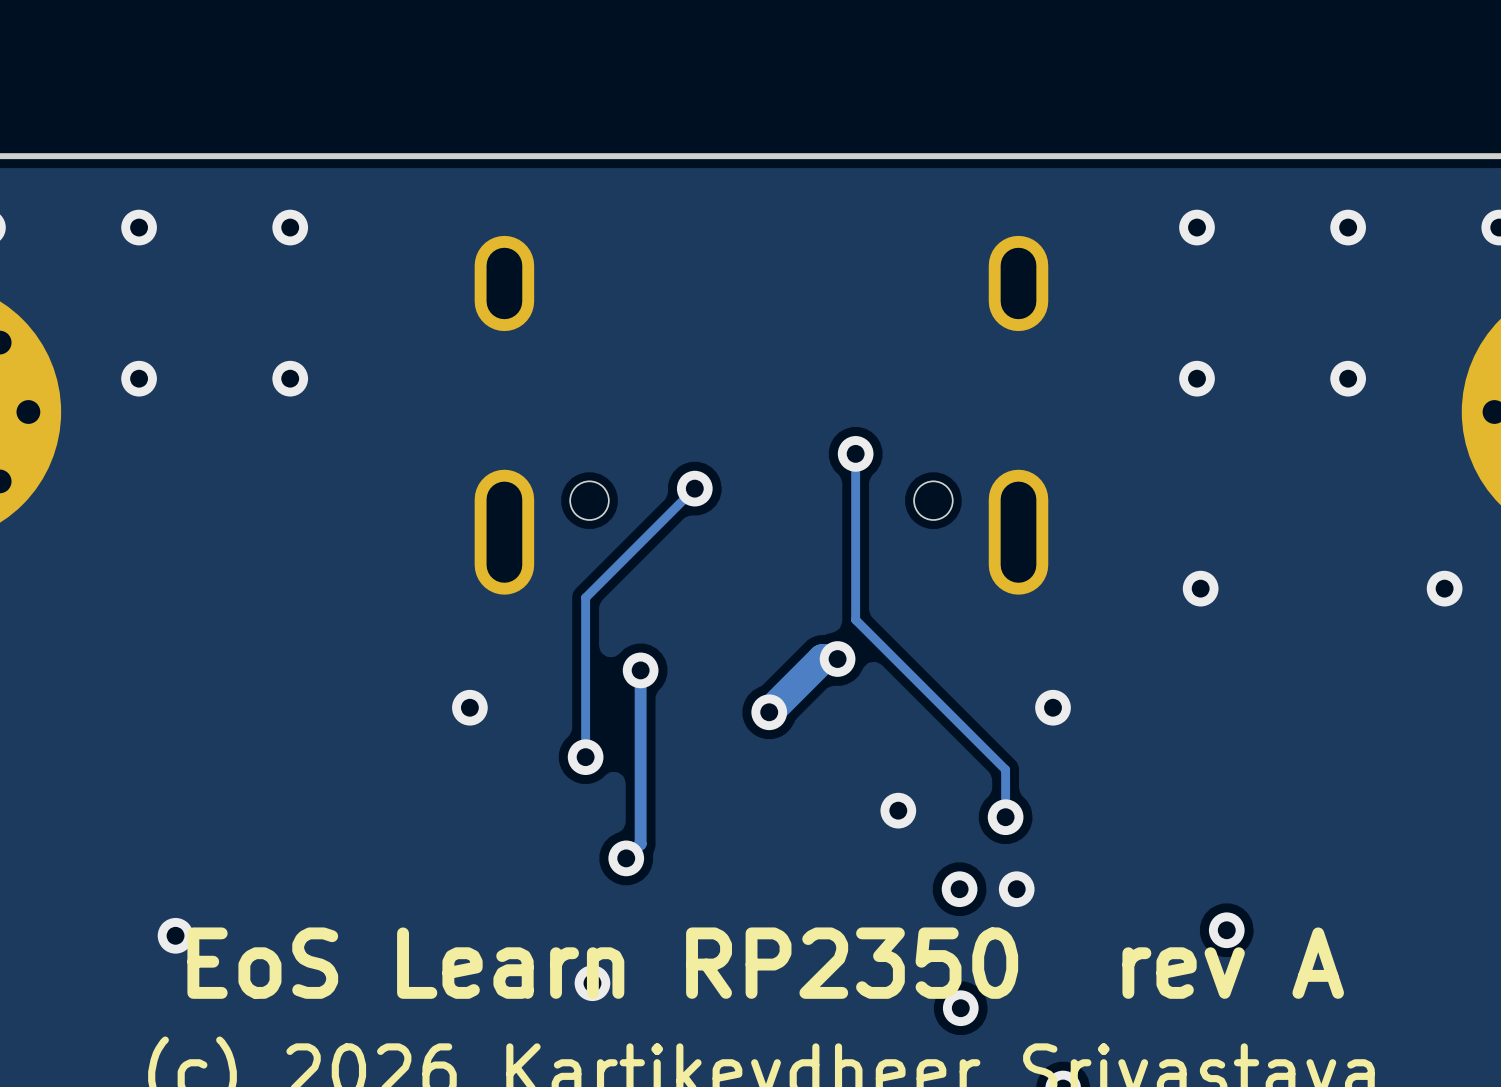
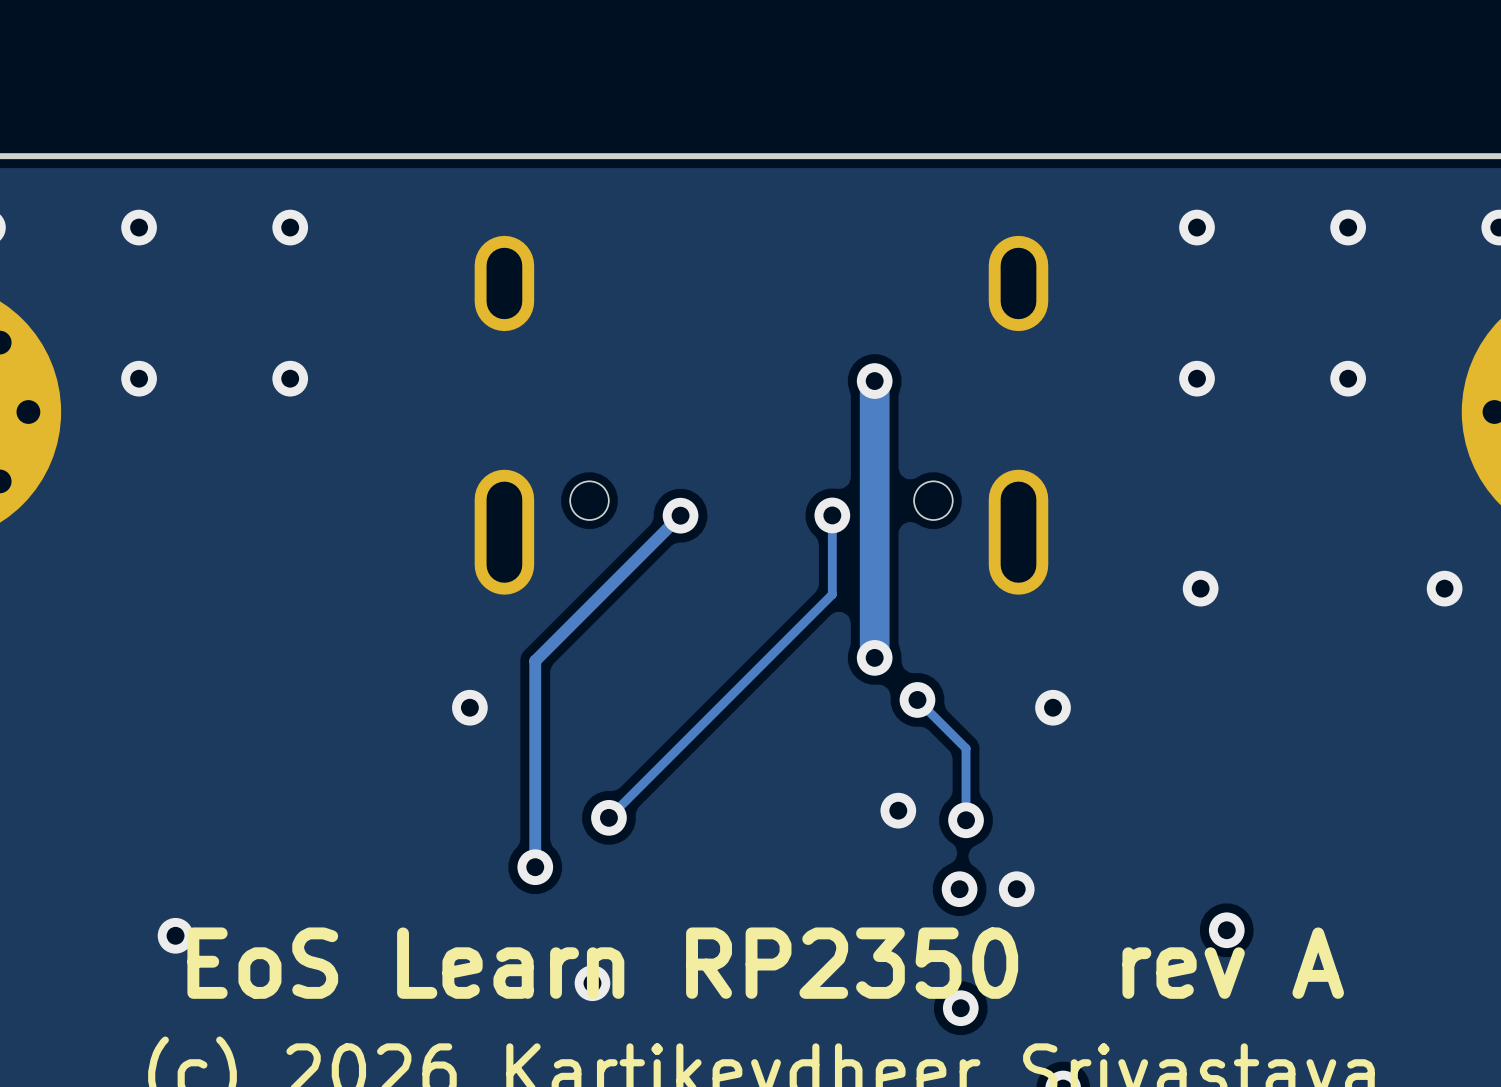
track: none -> (874, 381) (874, 657)
via: none -> (874, 381)
track: (855, 453) (855, 619) (1005, 769) (1005, 817) -> none
via: (855, 453) -> none
track: (694, 488) (585, 597) (585, 757) -> none
via position: (694, 488) -> (680, 515)
track: none -> (680, 515) (535, 660) (535, 867)
track: none -> (832, 515) (832, 594) (608, 817)
via: none -> (832, 515)
track: (837, 659) (822, 659) (769, 712) -> none
via position: (837, 659) -> (874, 657)
track: (640, 670) (640, 843) (626, 858) -> none
via: (640, 670) -> none
track: none -> (917, 699) (966, 748) (966, 820)
via: none -> (917, 699)
via: (769, 712) -> none
via: (585, 757) -> none
via: none -> (608, 817)
via position: (1005, 817) -> (966, 820)
via: (626, 858) -> none
via: none -> (535, 867)

